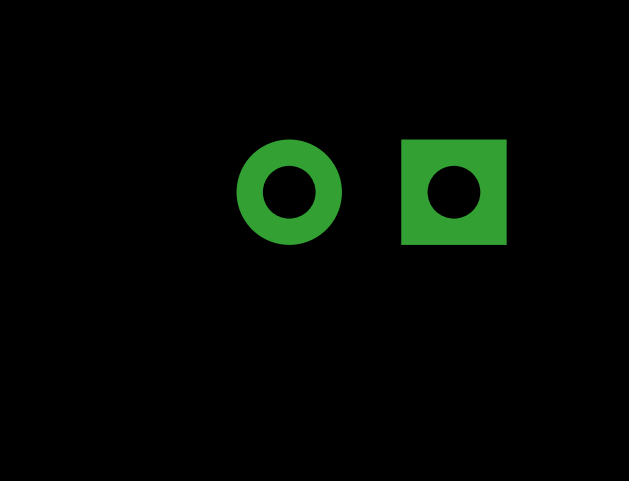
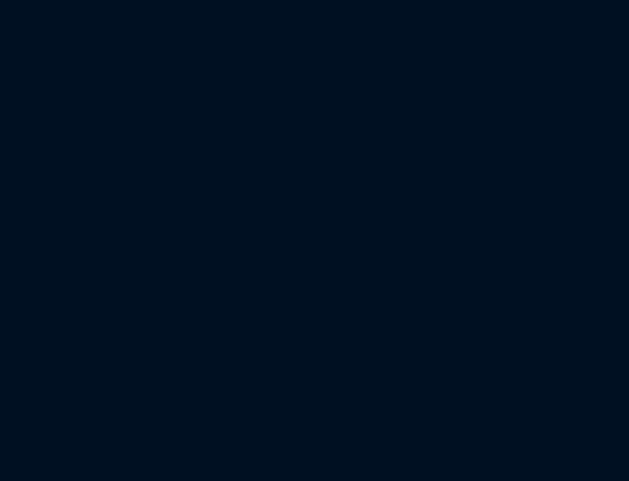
part: (371, 192) -> none

